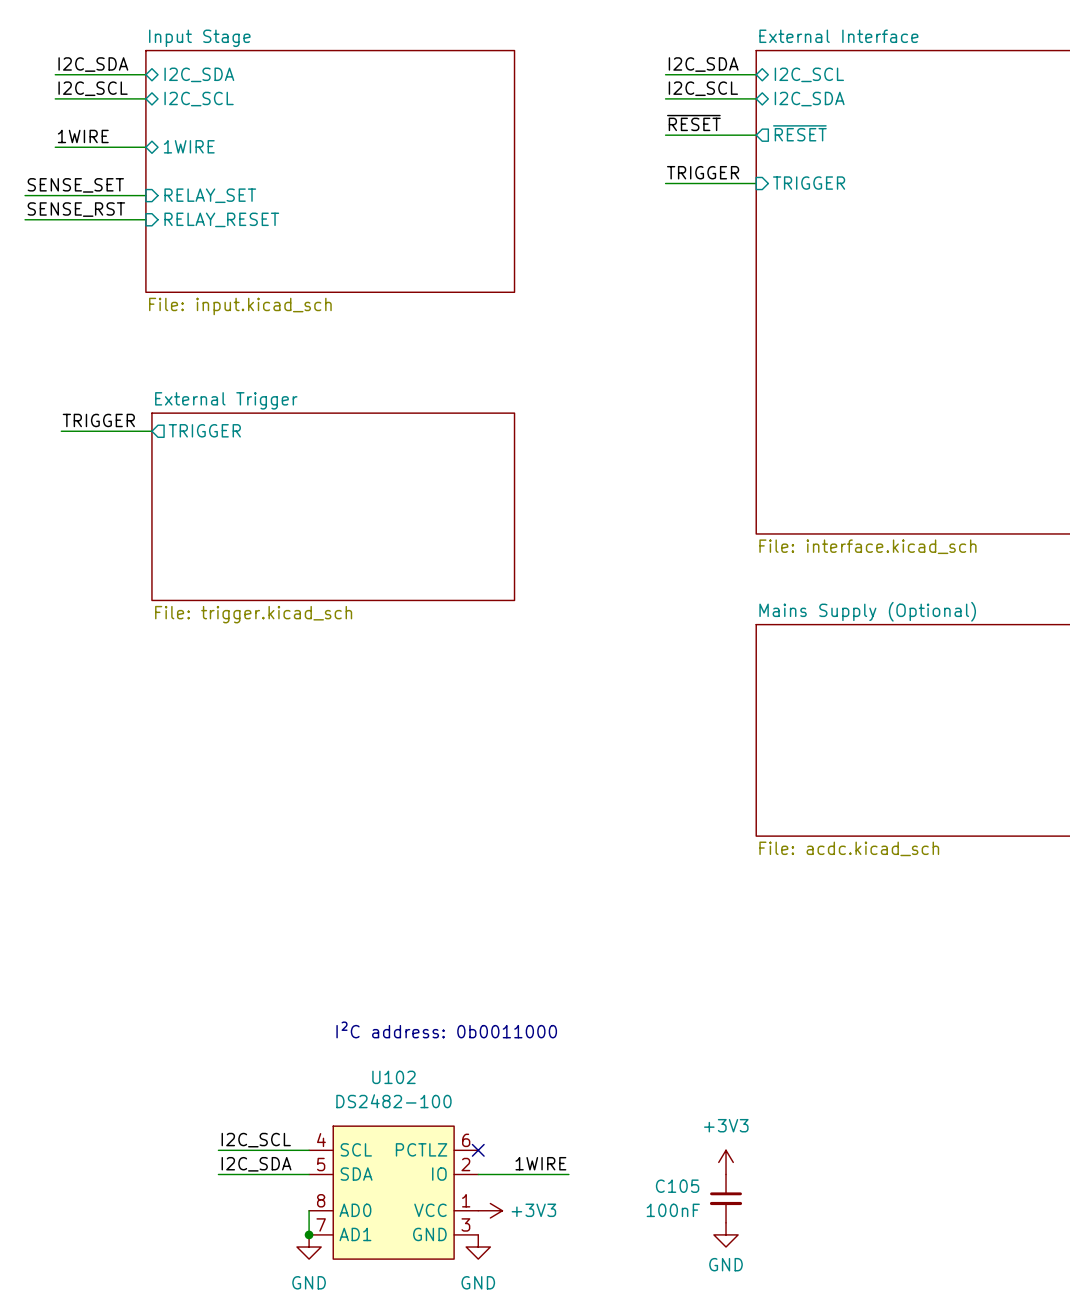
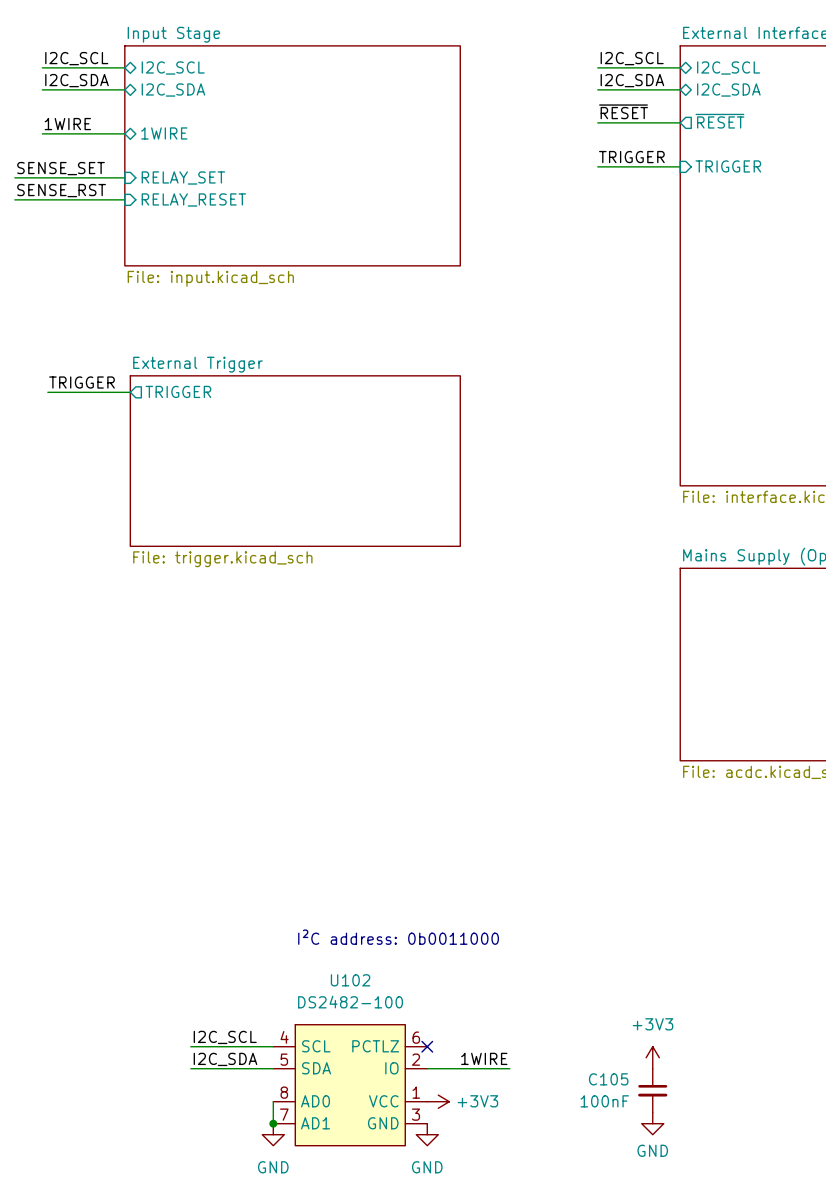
label: I2C_SDA (93, 64) -> I2C_SCL (76, 58)
label: I2C_SDA (703, 64) -> I2C_SCL (632, 58)
sheet pin: I2C_SDA (199, 74) -> I2C_SCL (173, 68)
label: I2C_SCL (93, 88) -> I2C_SDA (77, 80)
label: I2C_SCL (703, 88) -> I2C_SDA (632, 80)
sheet pin: I2C_SCL (199, 99) -> I2C_SDA (173, 90)

